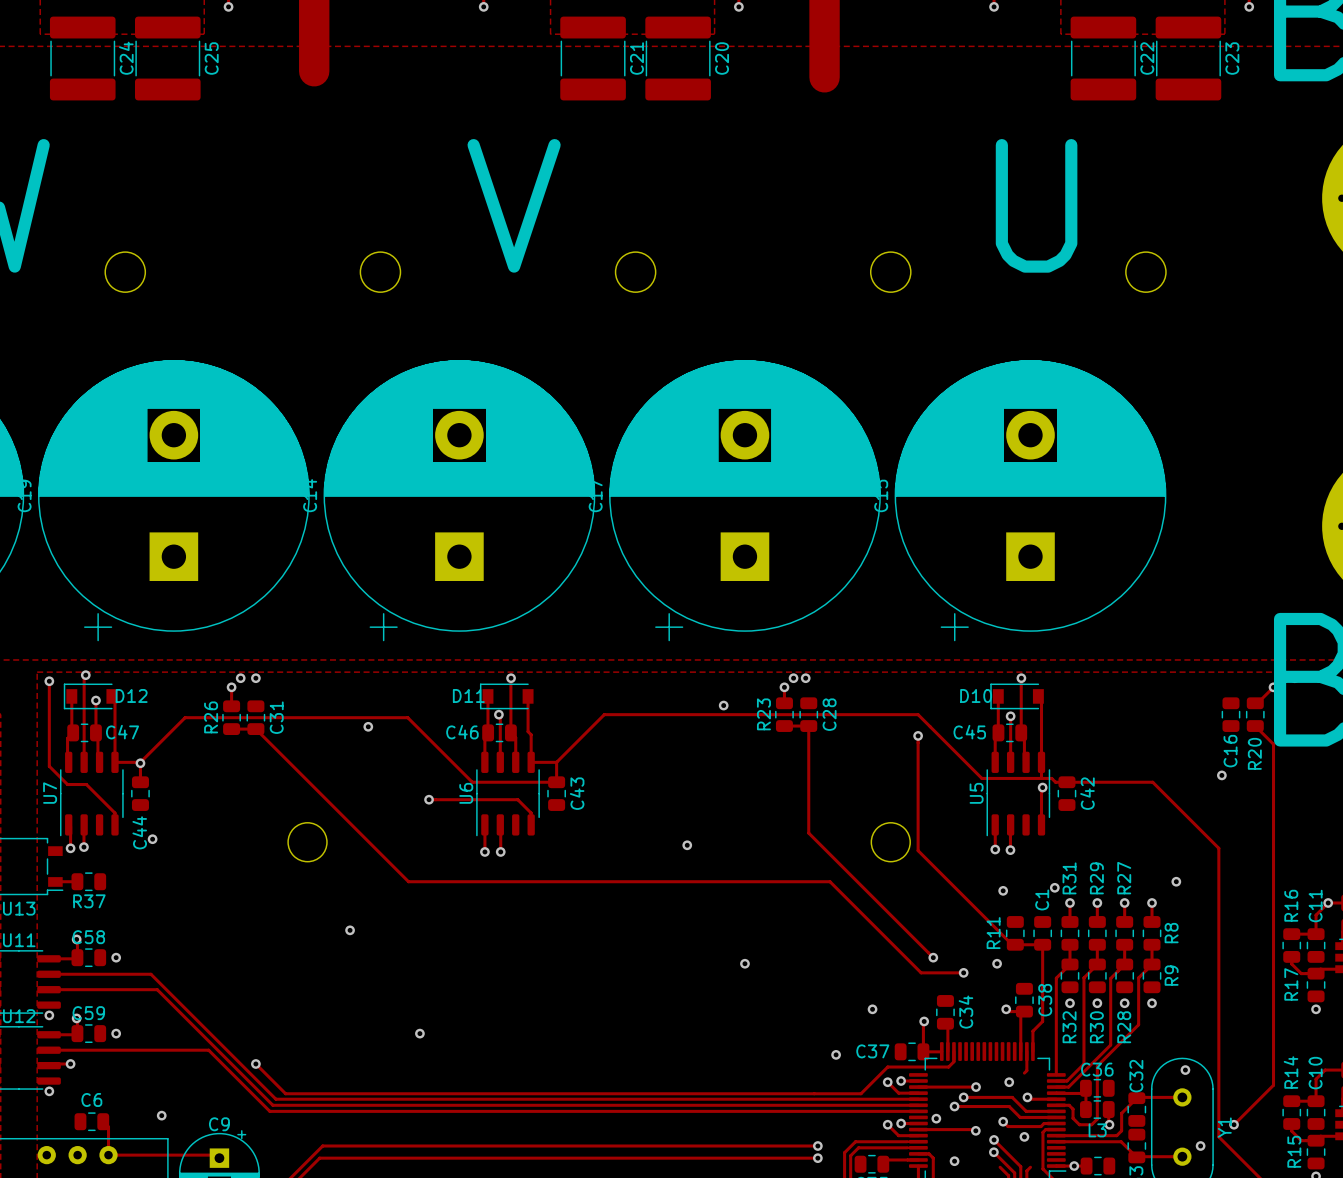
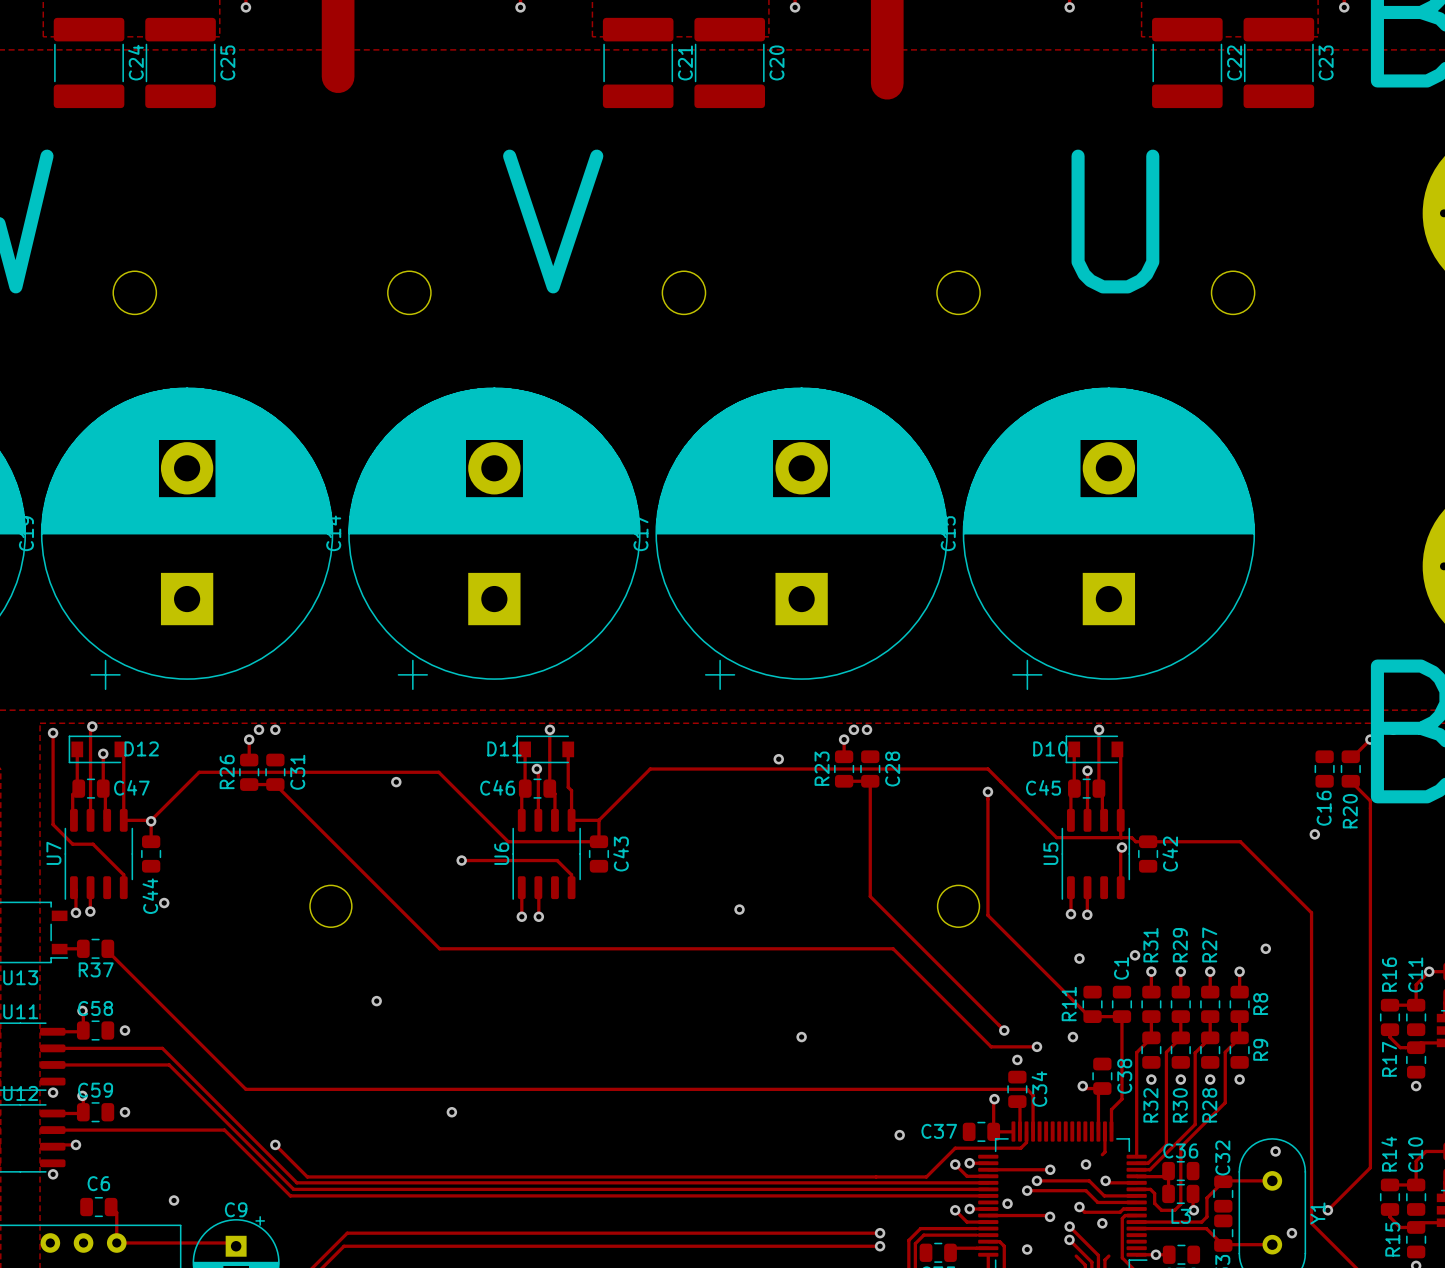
track: none -> (107, 948) (107, 951) (245, 1089) (1027, 1089) (1033, 1095) (1033, 1131)
via: none -> (1017, 1059)
via: (872, 1009) -> none

